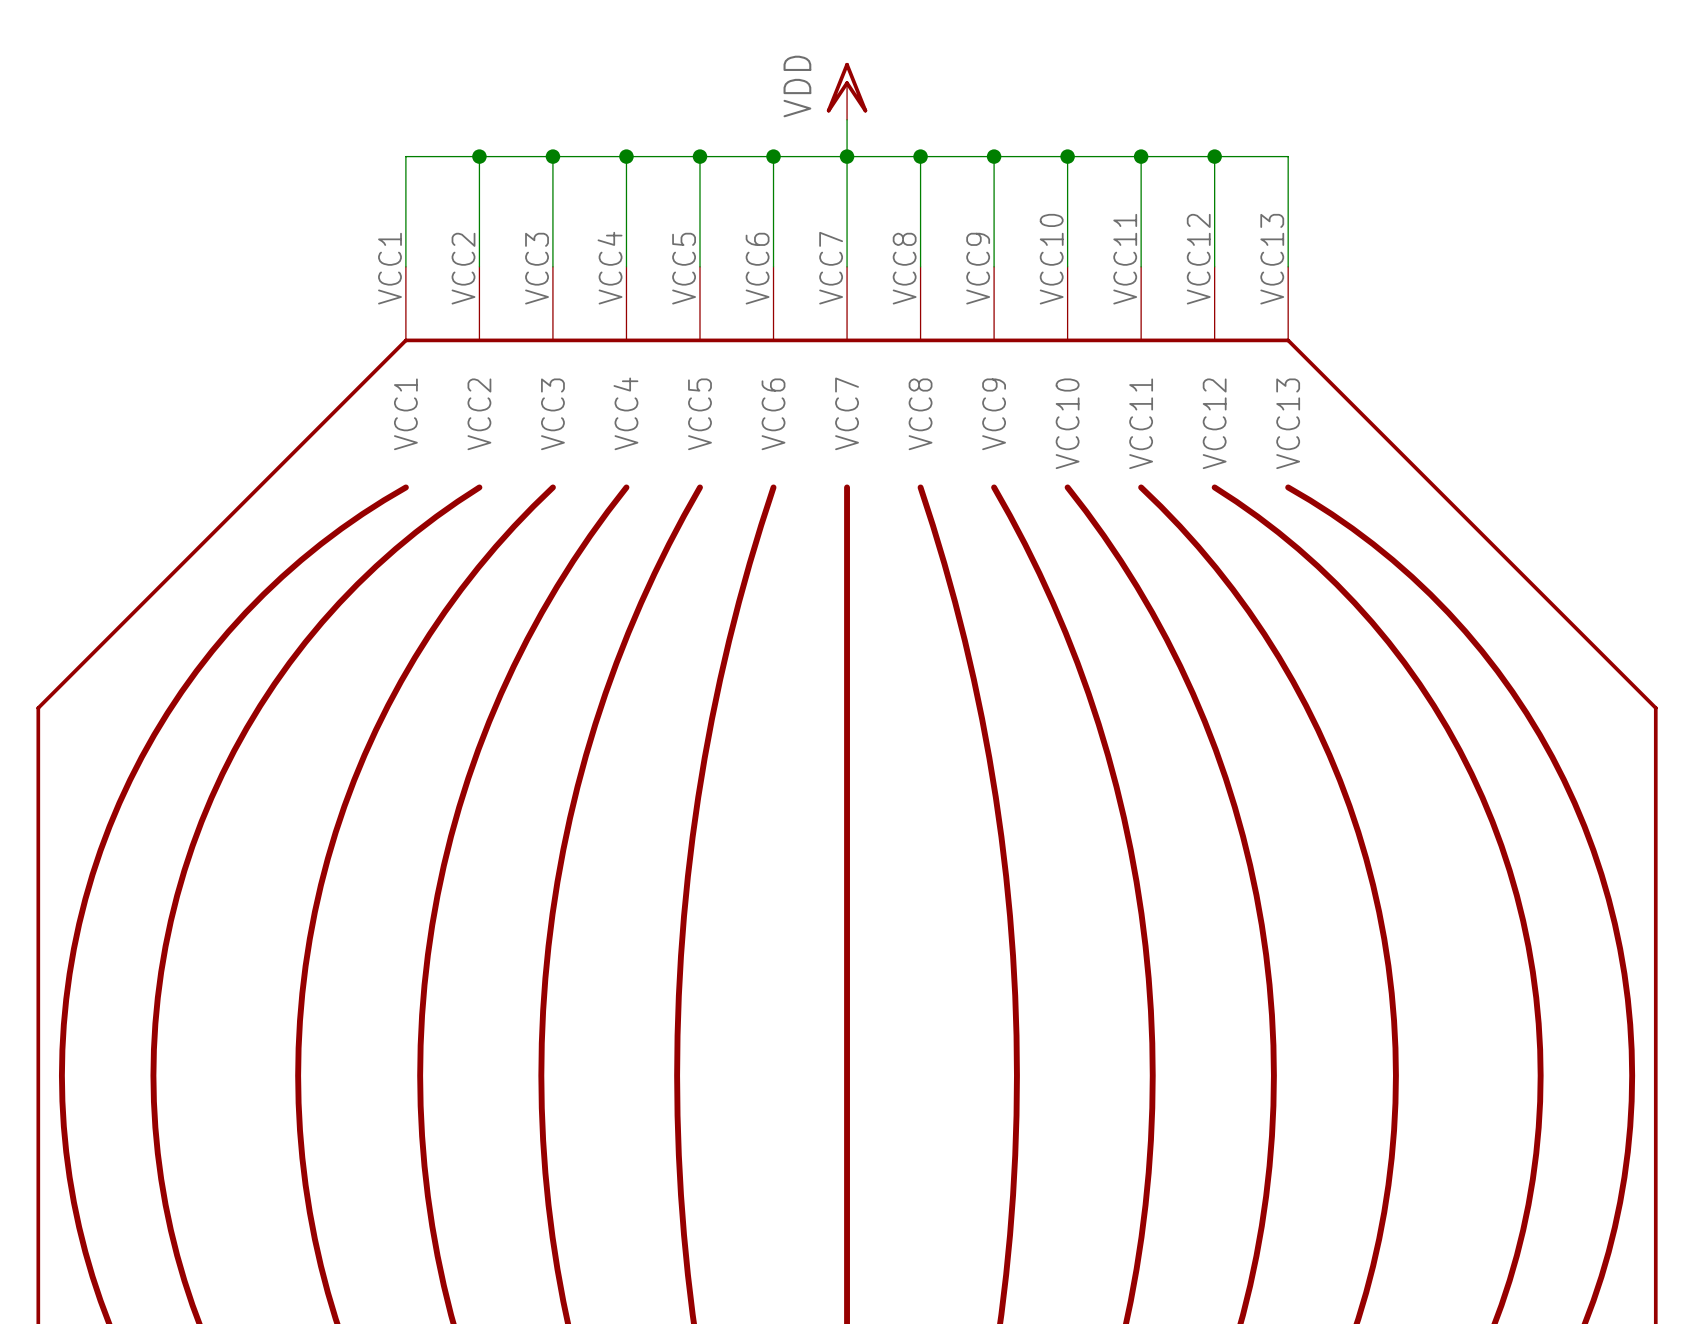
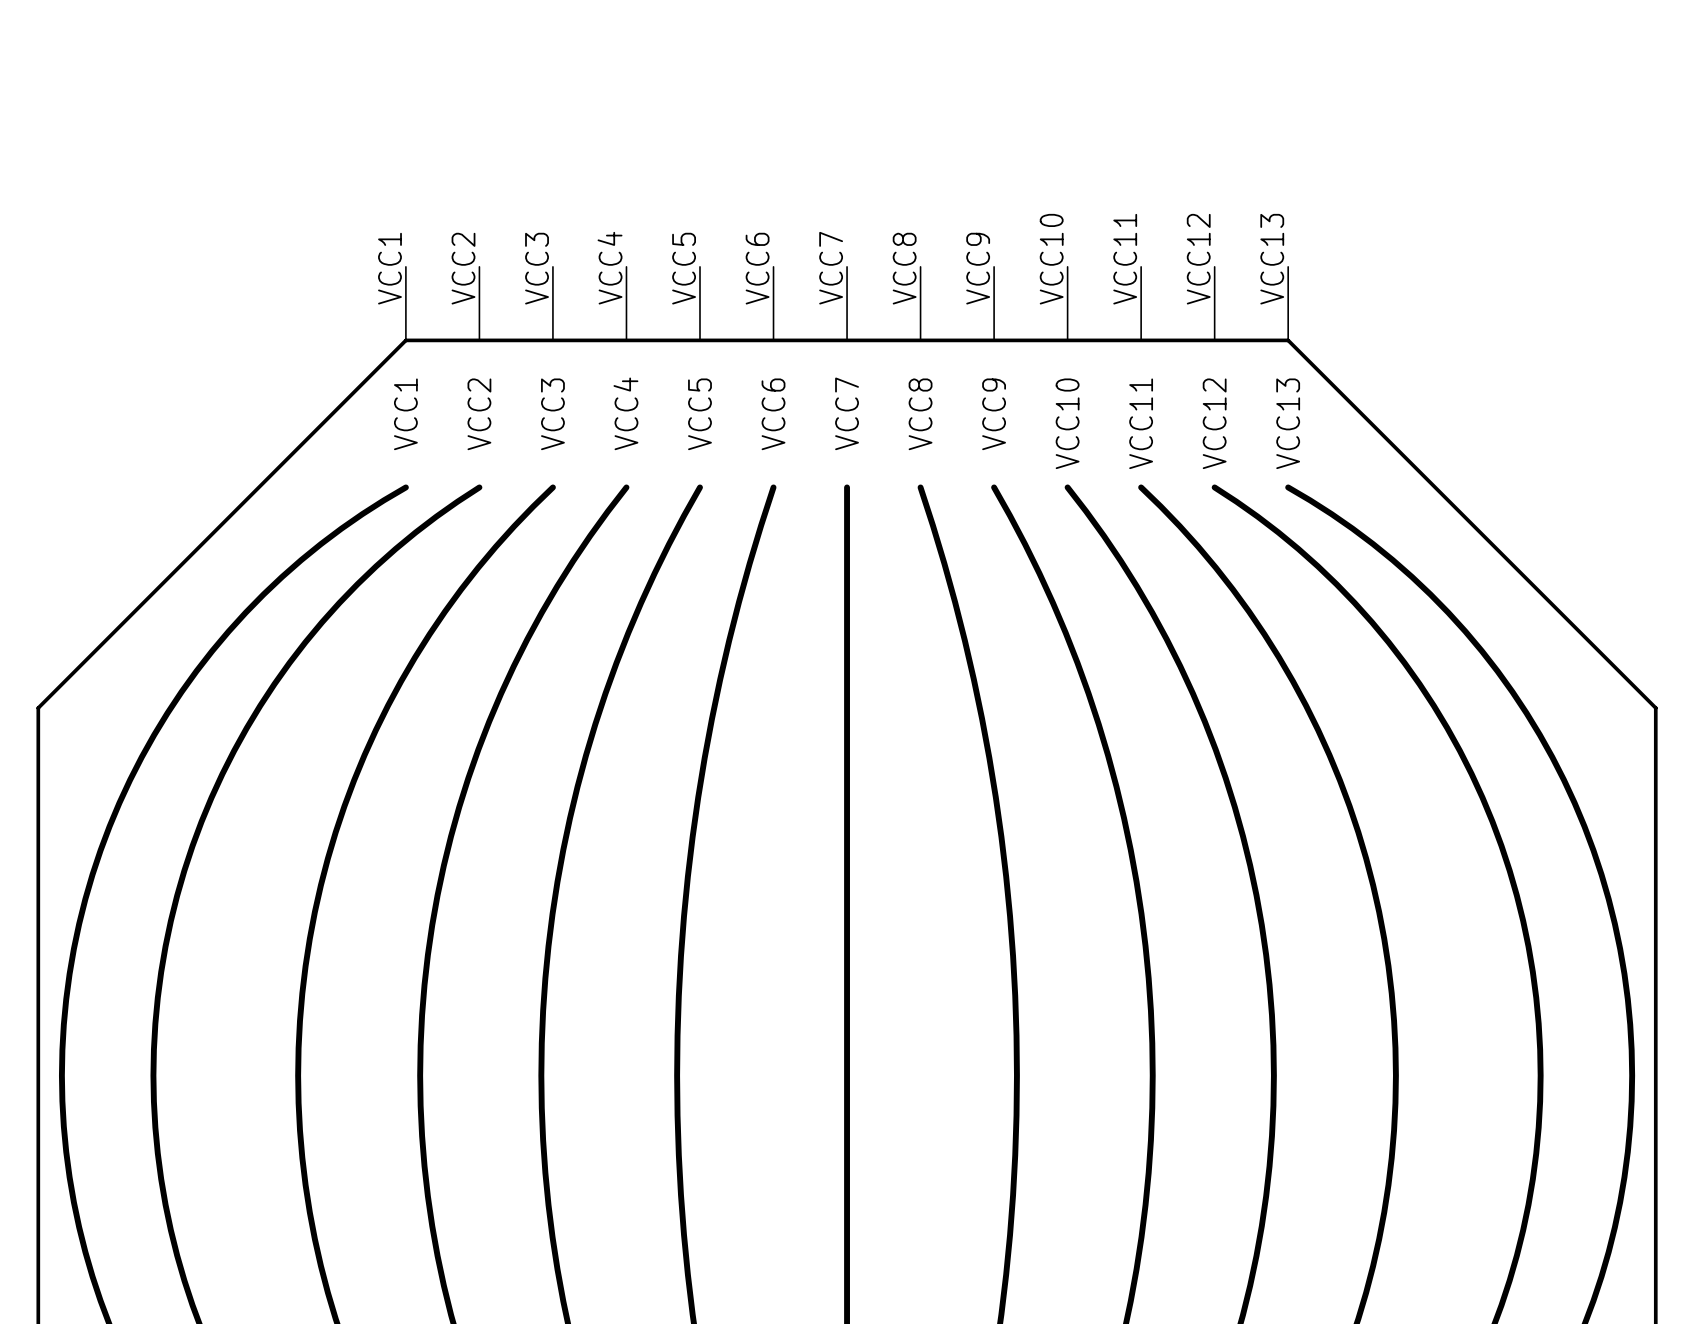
power symbol: VDD (847, 91) -> none
wire: (847, 119) (847, 266) -> none
wire: (479, 156) (479, 266) -> none
junction: (479, 156) -> none
wire: (552, 156) (552, 266) -> none
junction: (552, 156) -> none
wire: (626, 156) (626, 266) -> none
junction: (626, 156) -> none
wire: (699, 156) (699, 266) -> none
junction: (699, 156) -> none
wire: (773, 156) (773, 266) -> none
junction: (773, 156) -> none
junction: (847, 156) -> none
wire: (920, 156) (920, 266) -> none
junction: (920, 156) -> none
wire: (994, 156) (994, 266) -> none
junction: (994, 156) -> none
wire: (1067, 156) (1067, 266) -> none
junction: (1067, 156) -> none
wire: (1141, 156) (1141, 266) -> none
junction: (1141, 156) -> none
wire: (1214, 156) (1214, 266) -> none
junction: (1214, 156) -> none
wire: (405, 266) (405, 156) (1288, 156) (1288, 266) -> none

